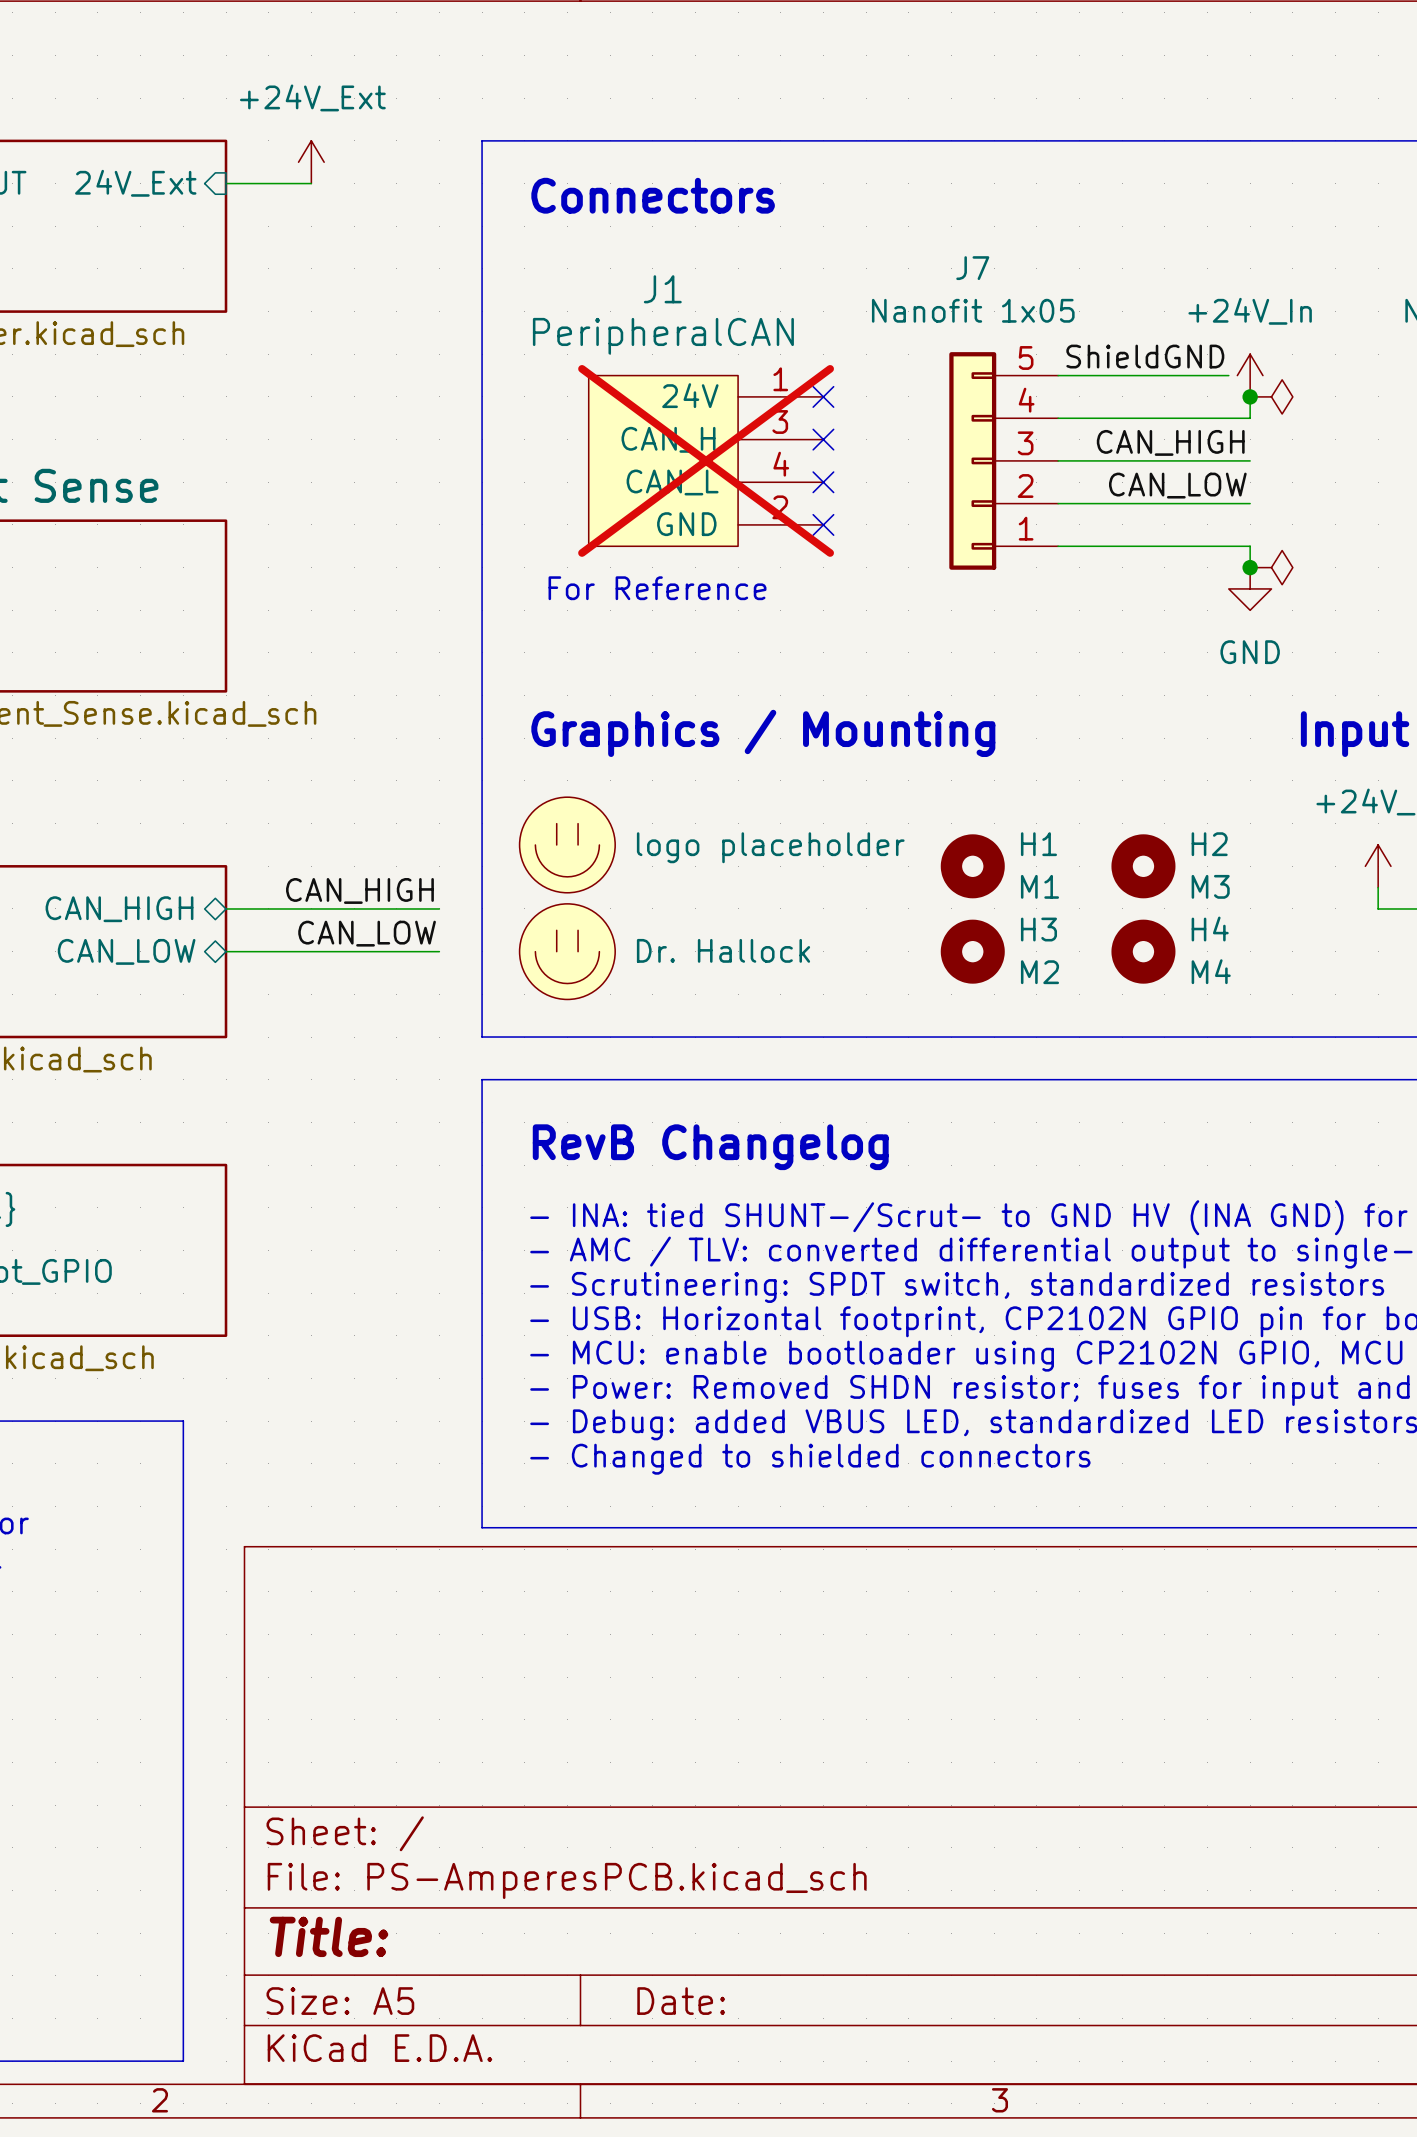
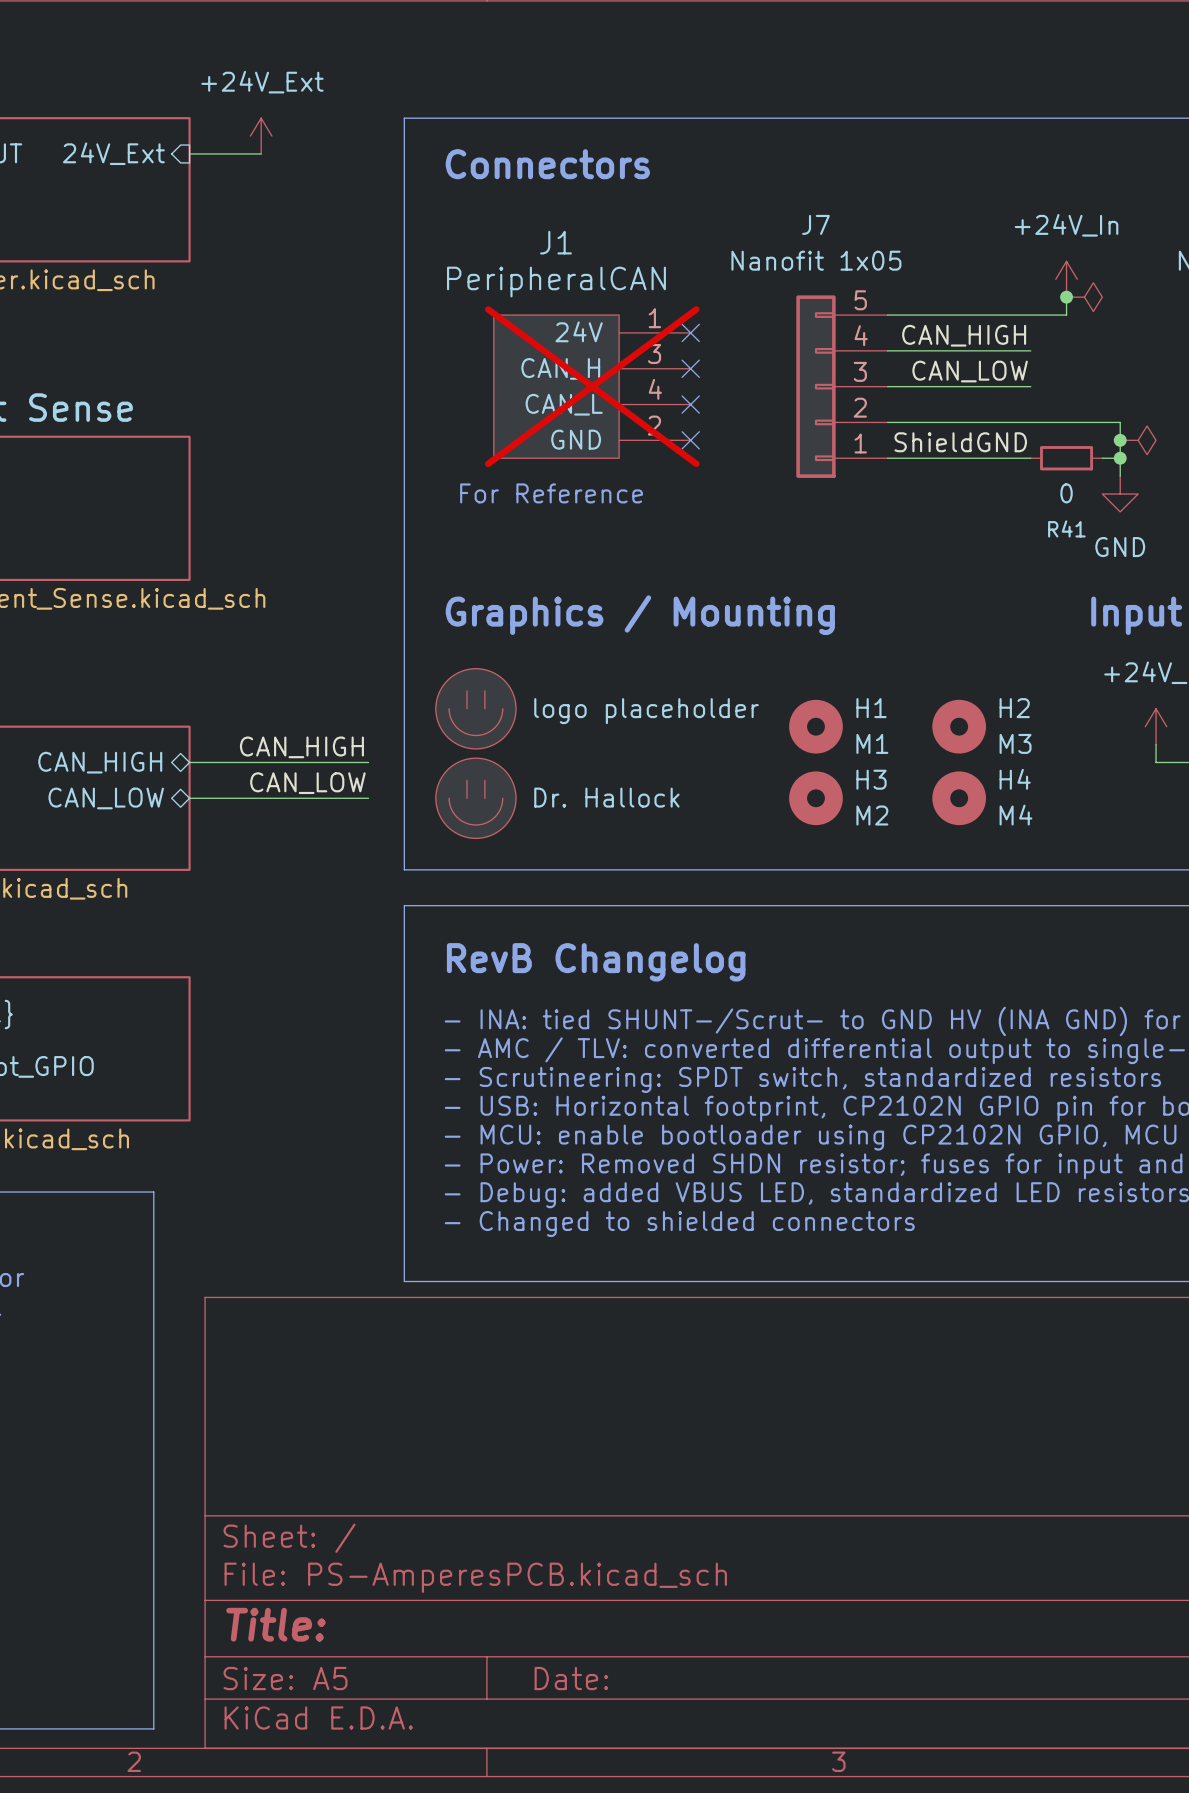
wire: none -> (1066, 297) (1066, 315) (1030, 315)
label position: ShieldGND (1145, 356) -> ShieldGND (960, 442)
power symbol position: +24V_In (1250, 375) -> +24V_In (1066, 279)
wire: (1250, 396) (1250, 418) (1228, 418) -> none
junction position: (1250, 396) -> (1066, 297)
power symbol position: (1271, 396) -> (1084, 297)
label position: CAN_HIGH (1170, 442) -> CAN_HIGH (964, 335)
wire: (1228, 460) (1250, 460) -> (1102, 458) (1120, 458)
label position: CAN_LOW (1177, 485) -> CAN_LOW (970, 371)
wire: none -> (1048, 422) (1120, 422) (1120, 476)
junction: none -> (1120, 440)
power symbol: none -> (1138, 440)
wire: (1228, 546) (1250, 546) (1250, 567) -> none
R41: none -> 0 (1066, 458)
junction: none -> (1120, 458)
junction: (1250, 567) -> none
power symbol: (1271, 567) -> none
power symbol position: GND (1250, 588) -> GND (1120, 494)

